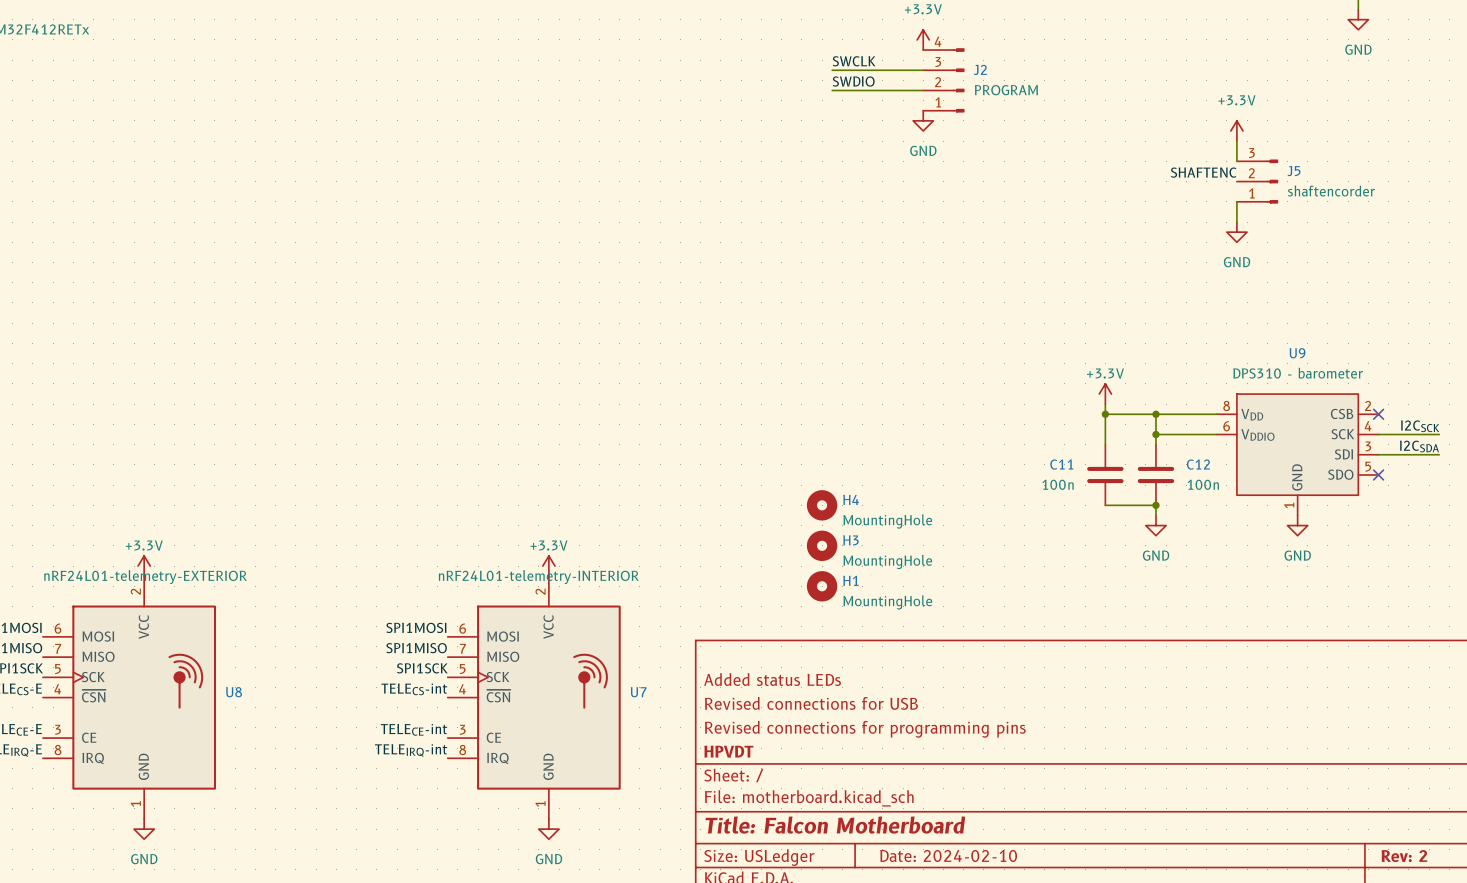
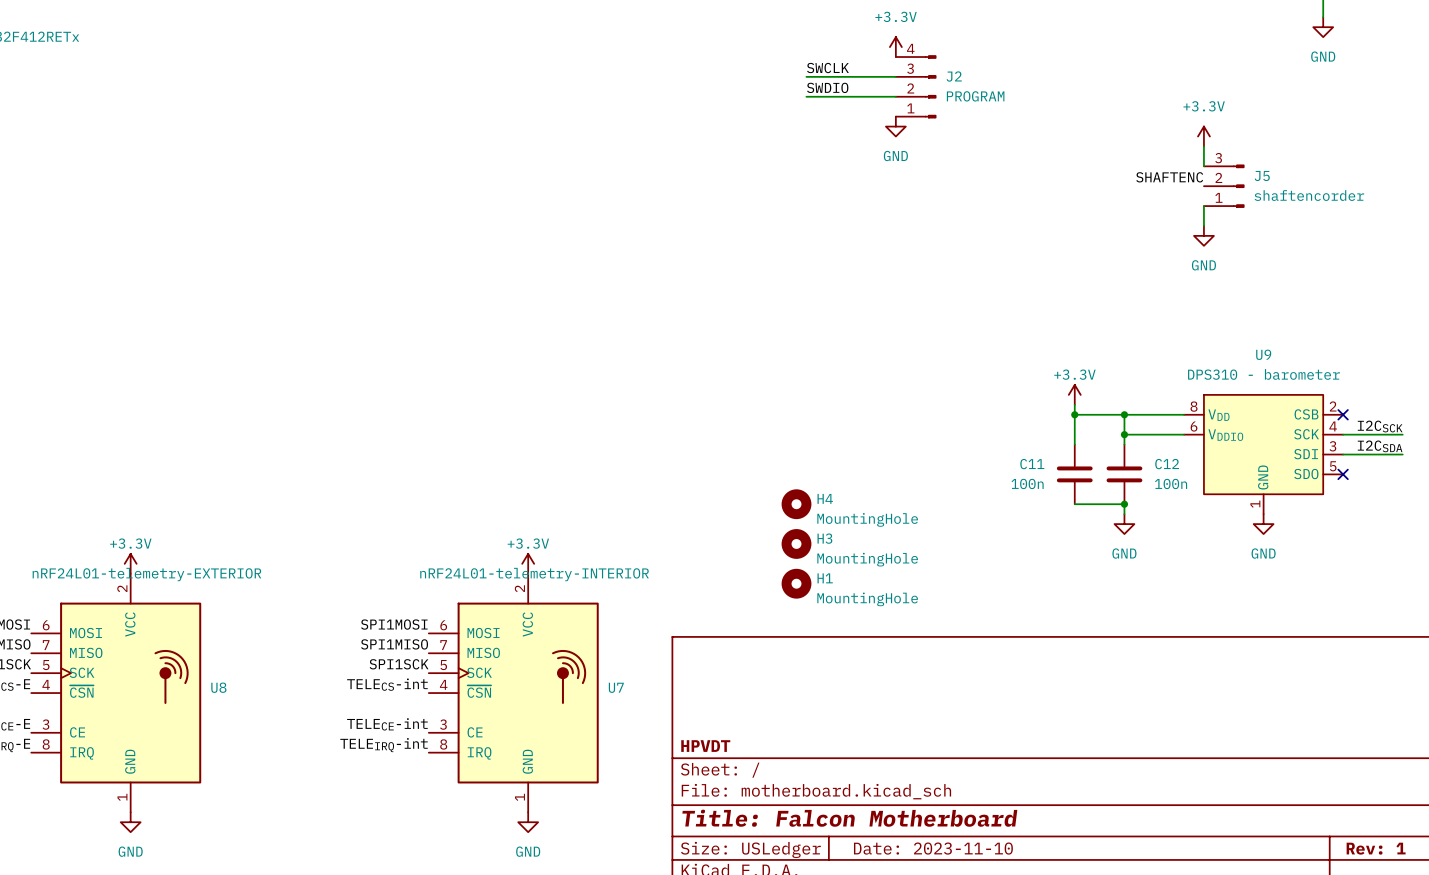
title block: Added status LEDs (772, 679) -> none
title block: Revised connections for USB (811, 703) -> none
title block: Revised connections for programming pins (865, 729) -> none
title block: Date: 2024-02-10 (948, 855) -> Date: 2023-11-10 (933, 848)
title block: Rev: 2 (1404, 856) -> Rev: 1 (1376, 848)

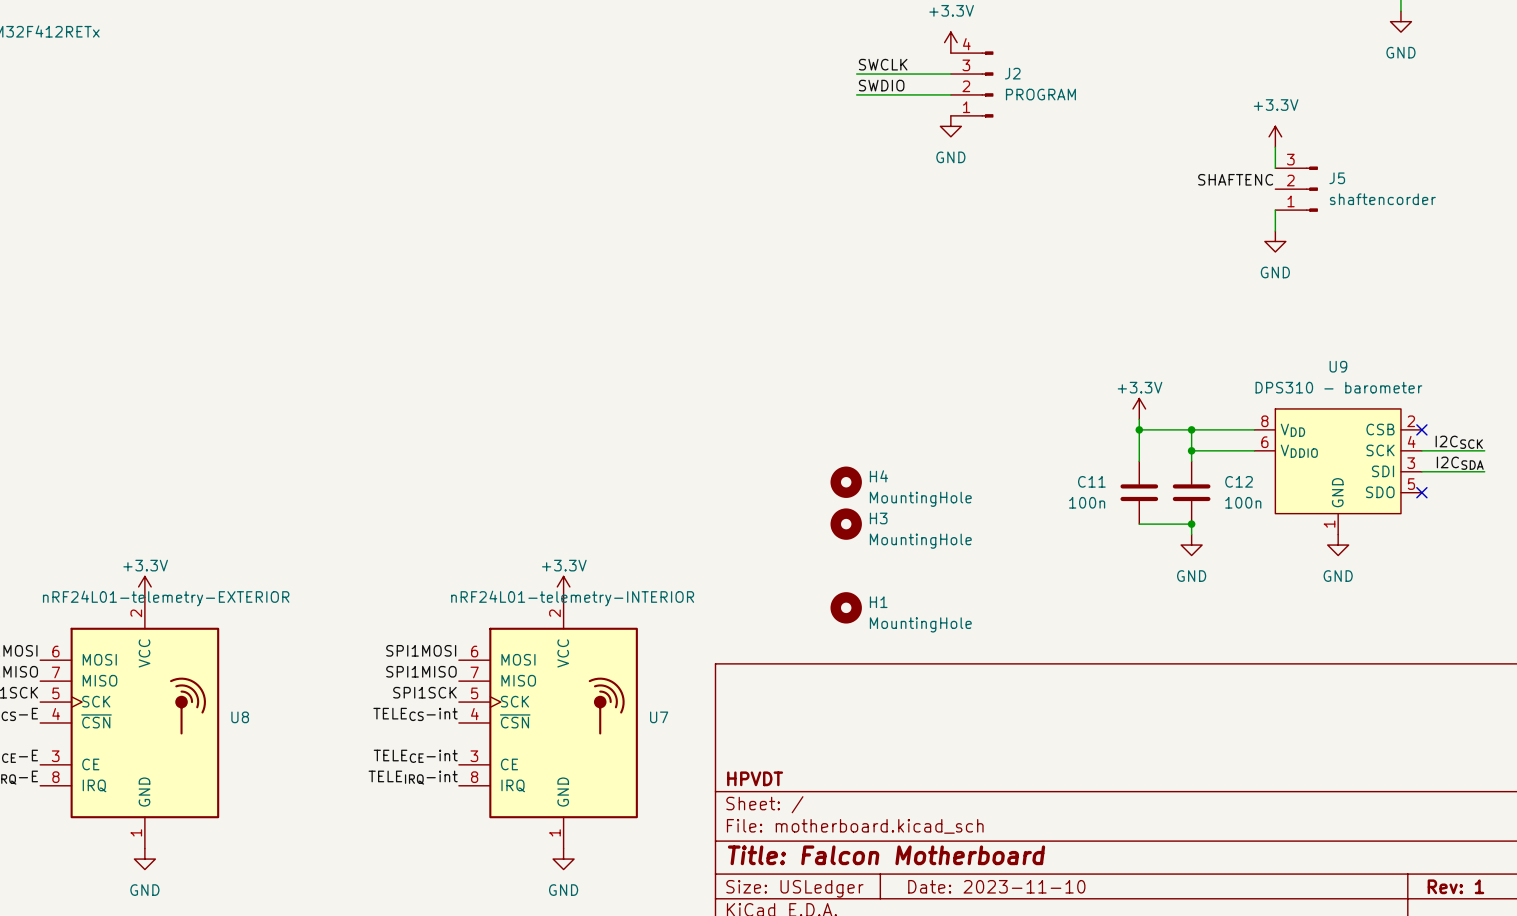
H4: none -> MountingHole (846, 482)
H4 name: H4 (825, 498) -> H3 (878, 518)
H3: MountingHole (796, 543) -> none

